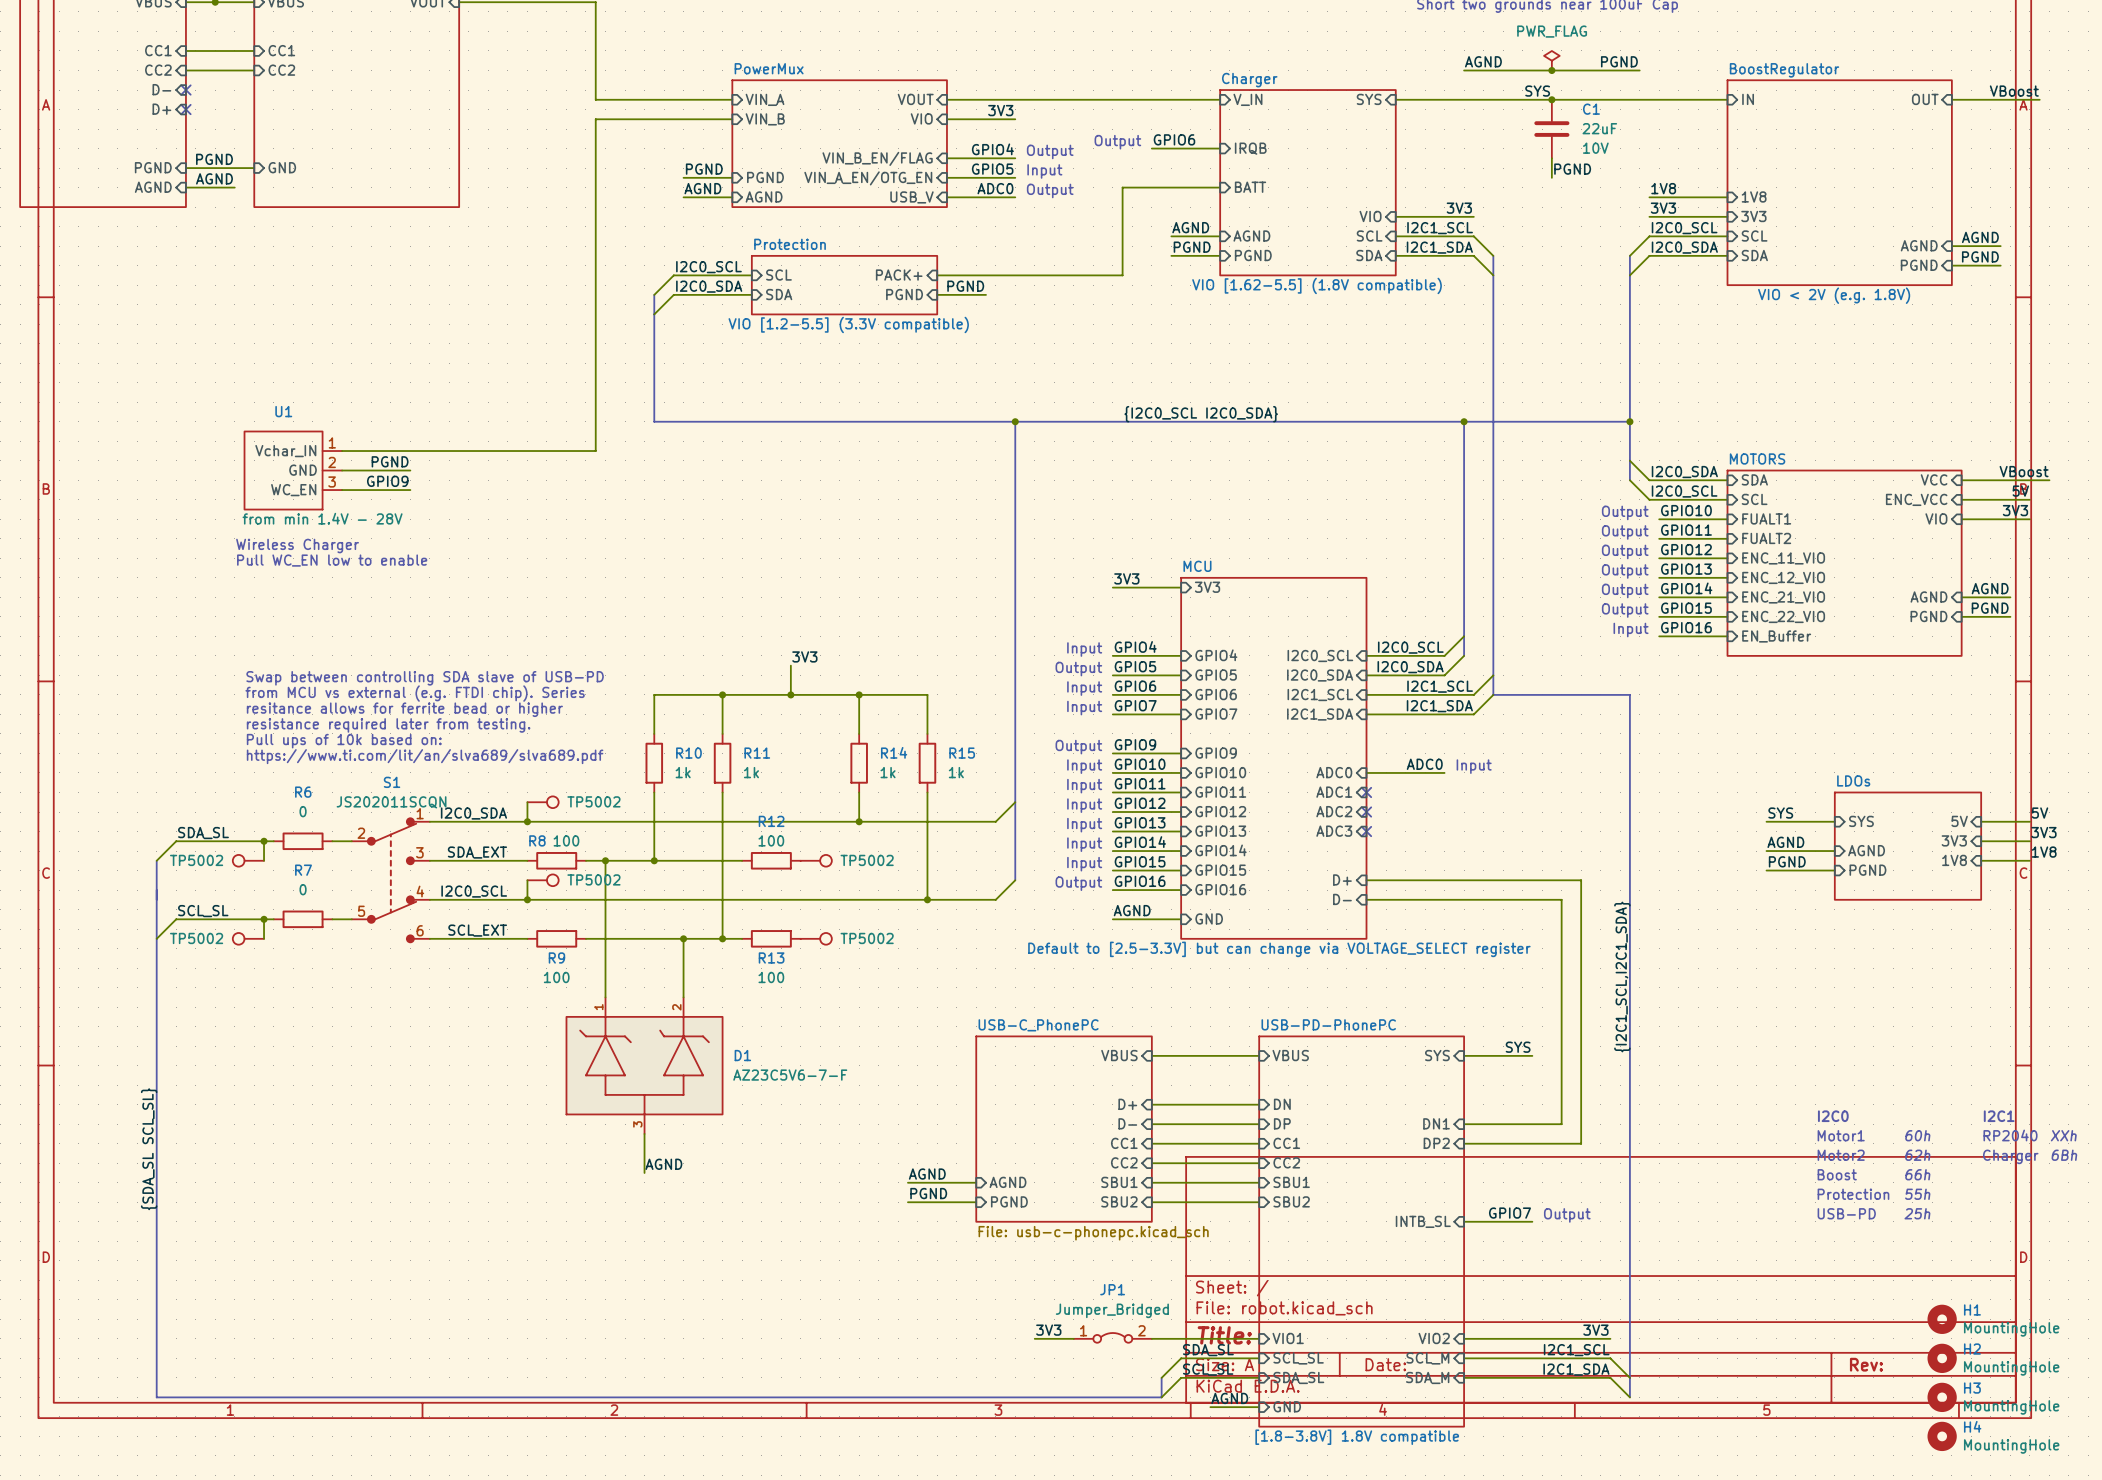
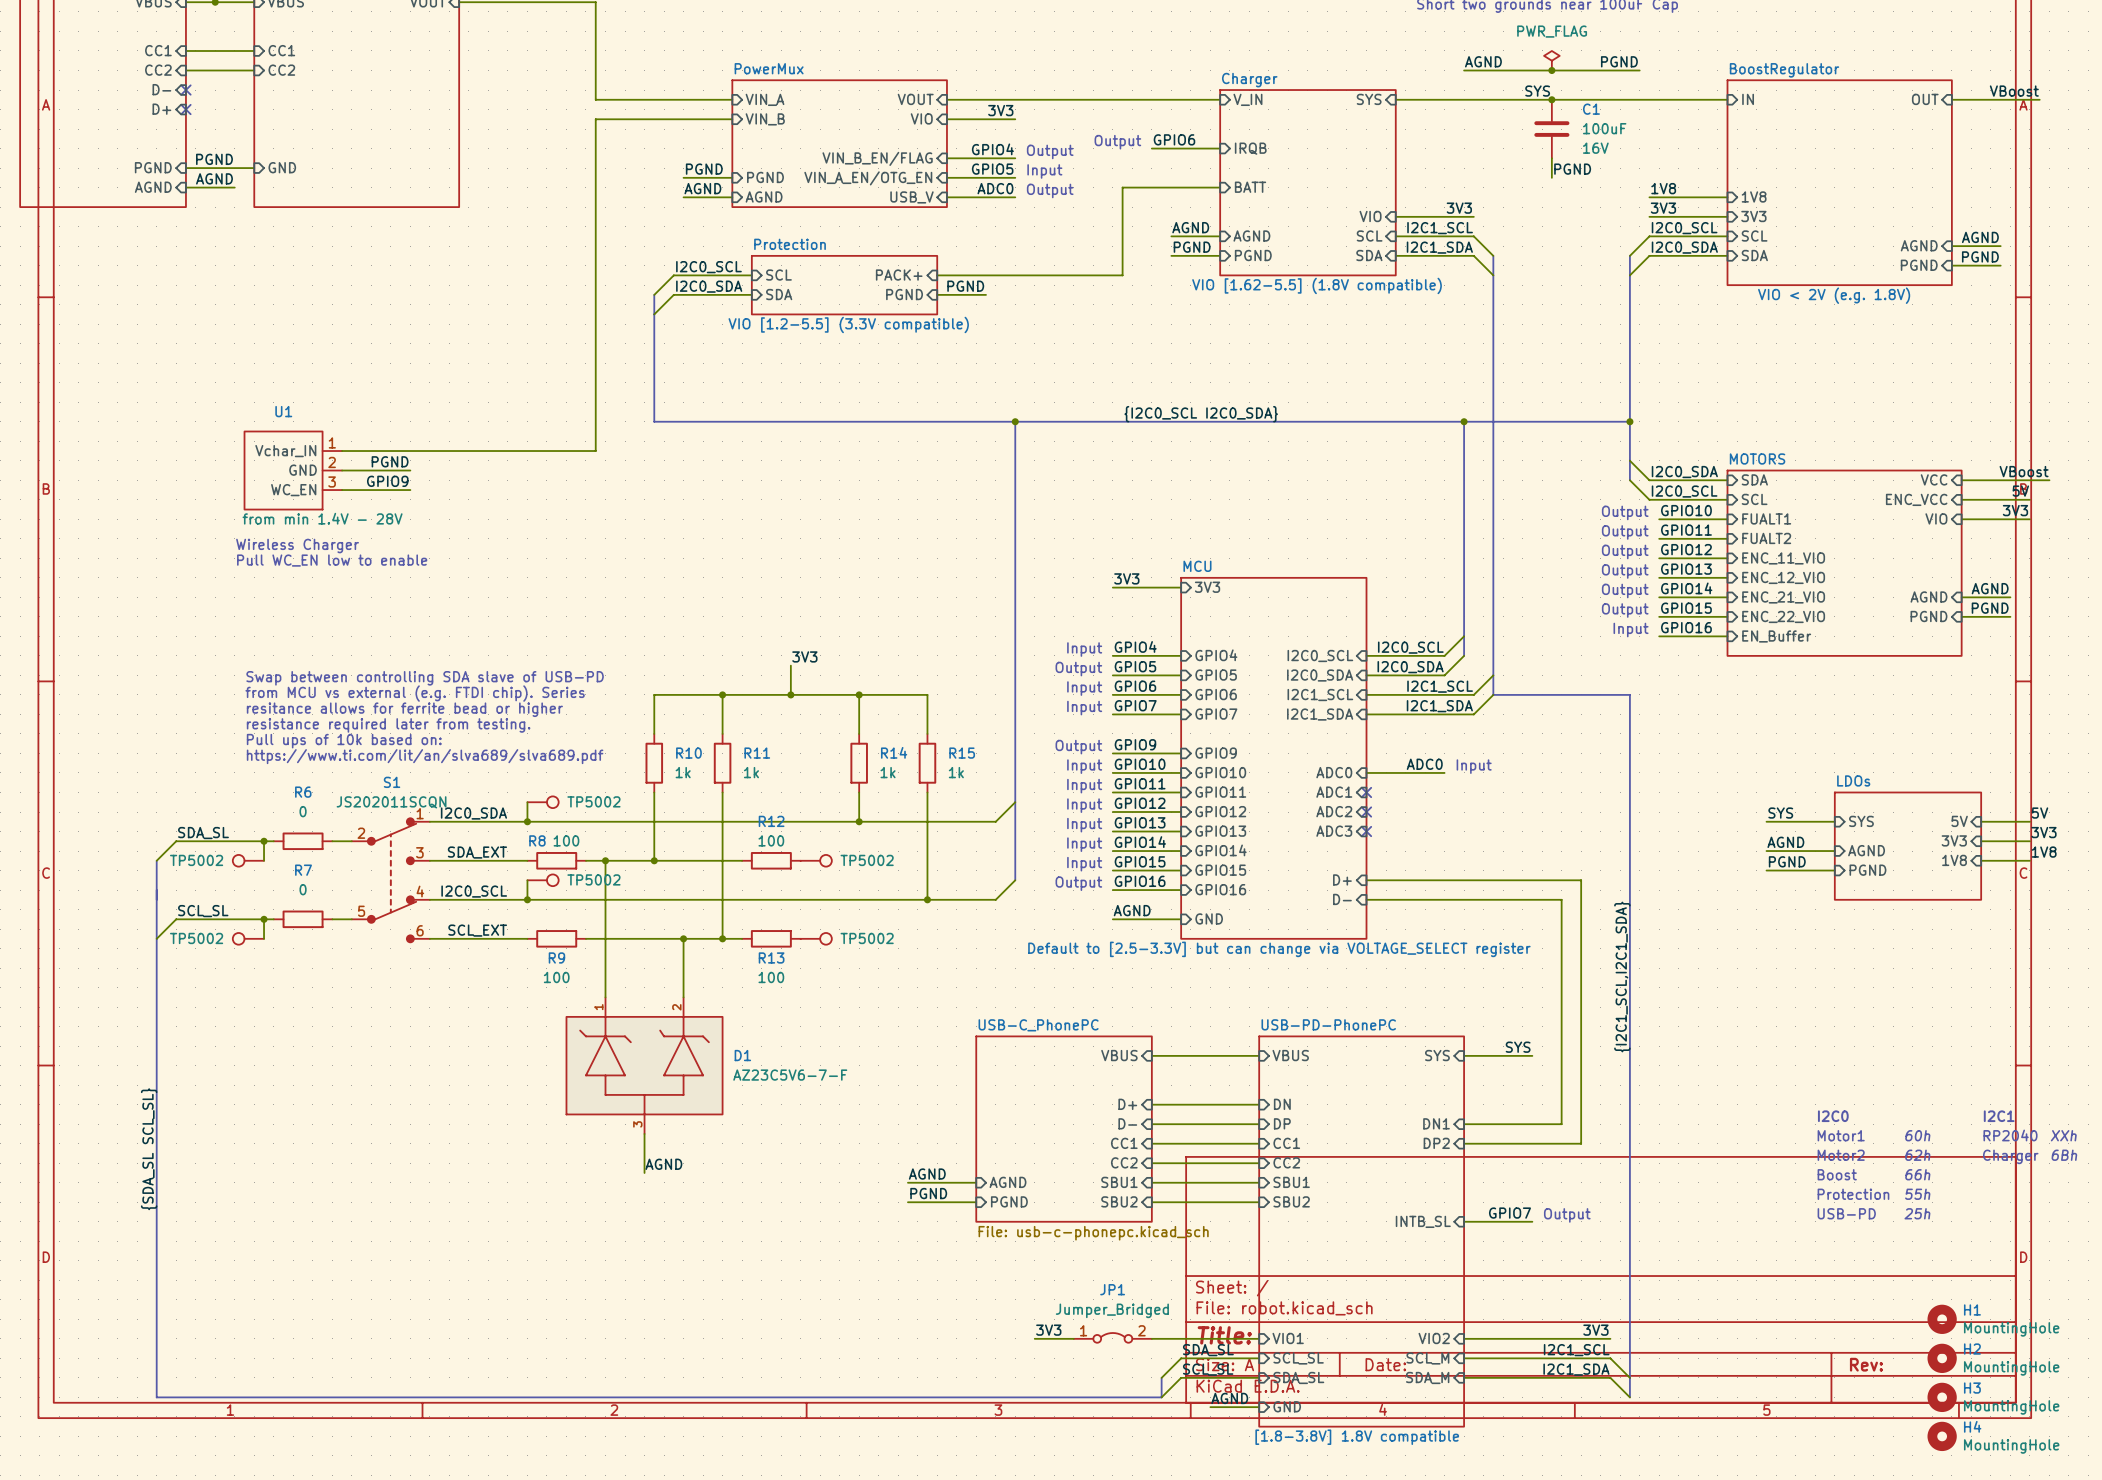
C1 value: 22uF (1599, 128) -> 100uF (1604, 128)
C1 text: 10V (1595, 148) -> 16V (1595, 148)

